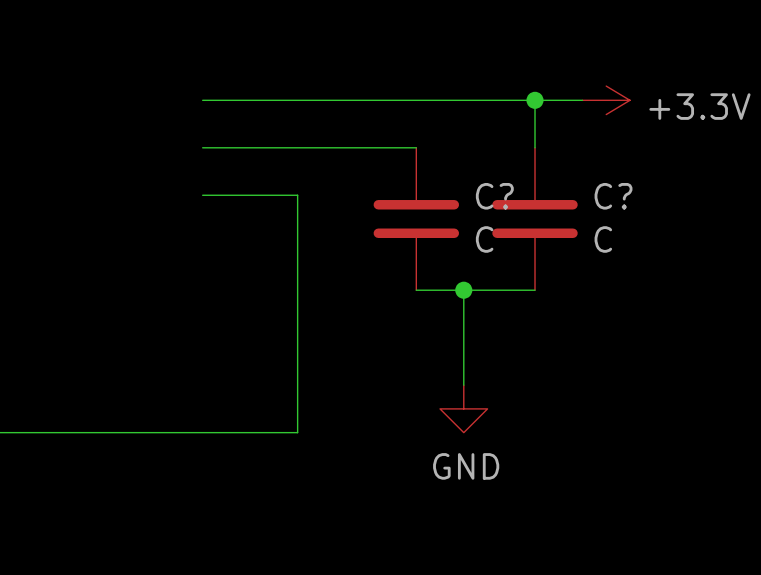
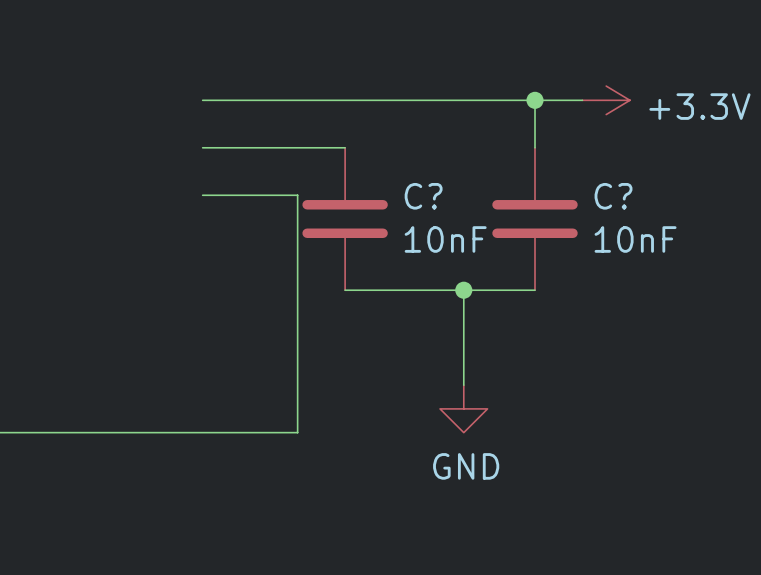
wire: (345, 147) (416, 147) -> (345, 290) (416, 290)
C?: none -> 10nF (345, 219)
C?: C (416, 219) -> none
C? value: C (603, 239) -> 10nF (635, 239)

